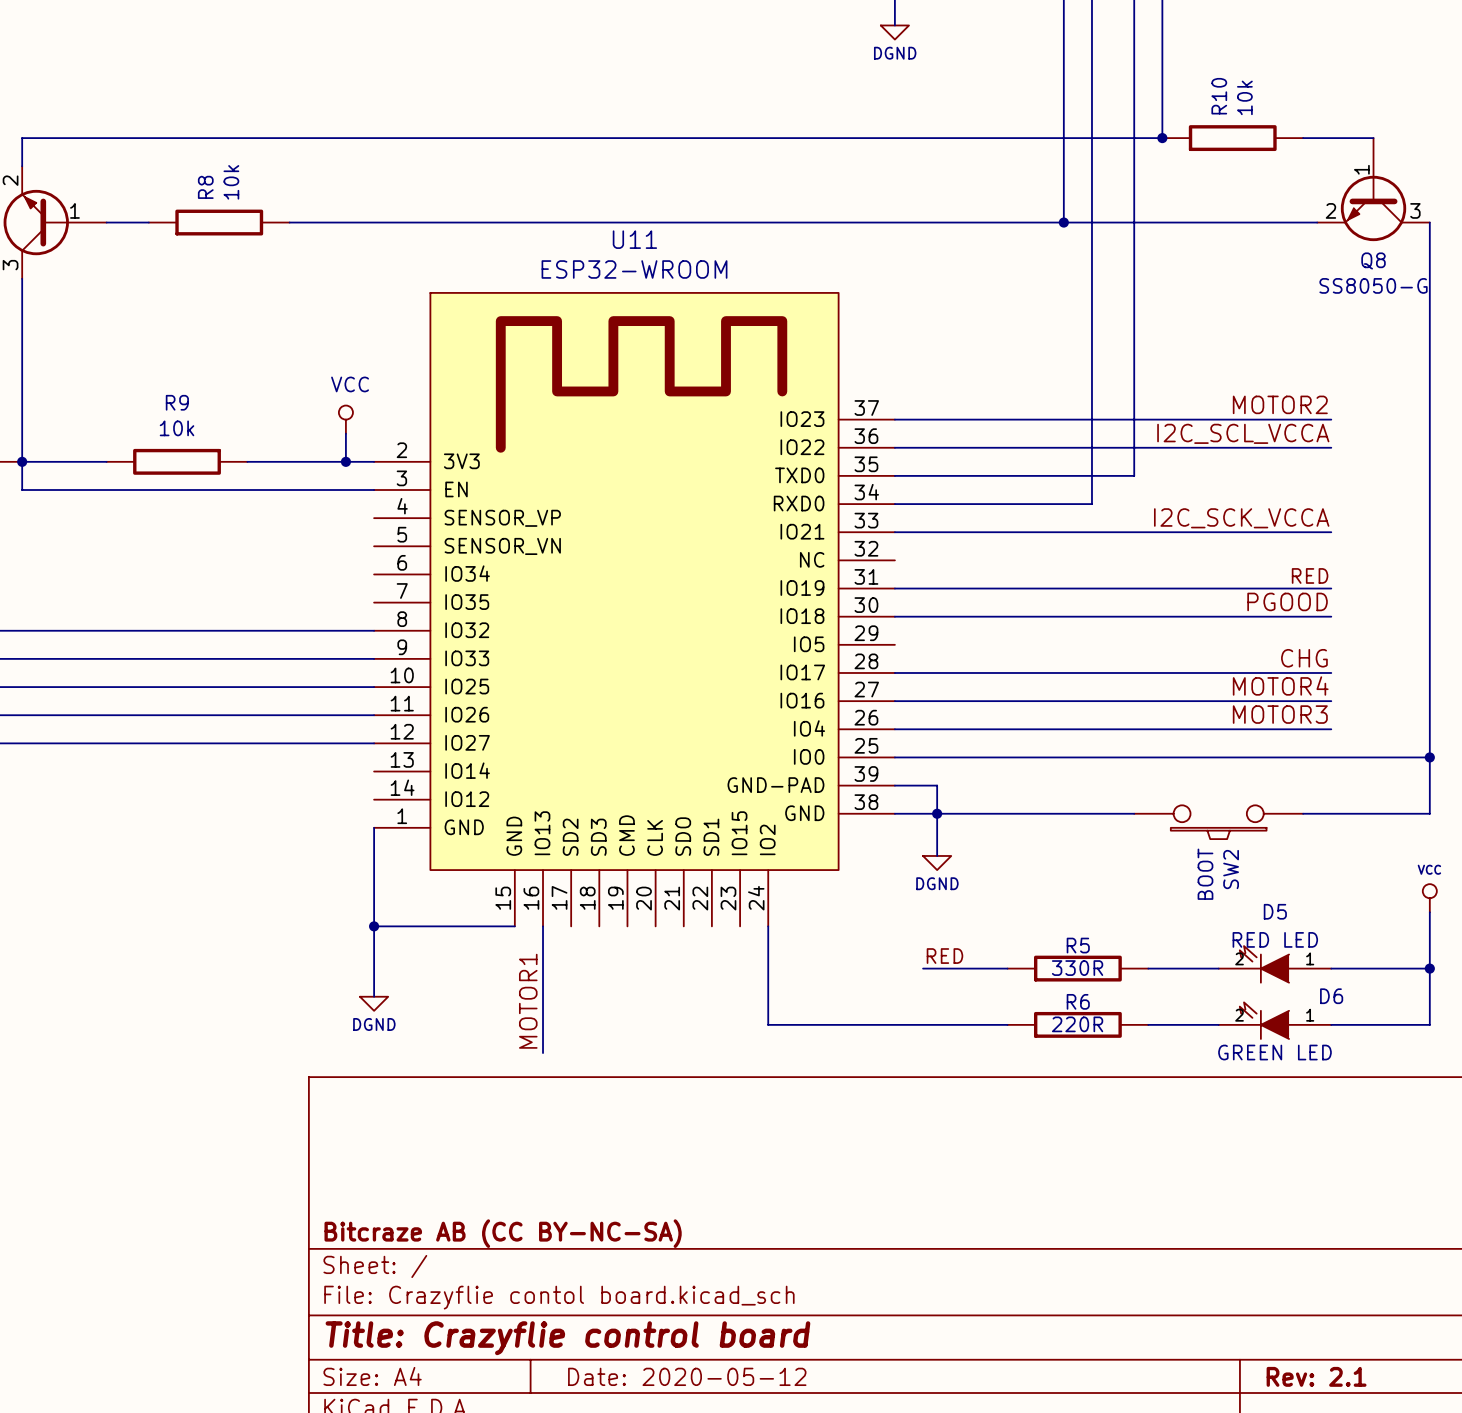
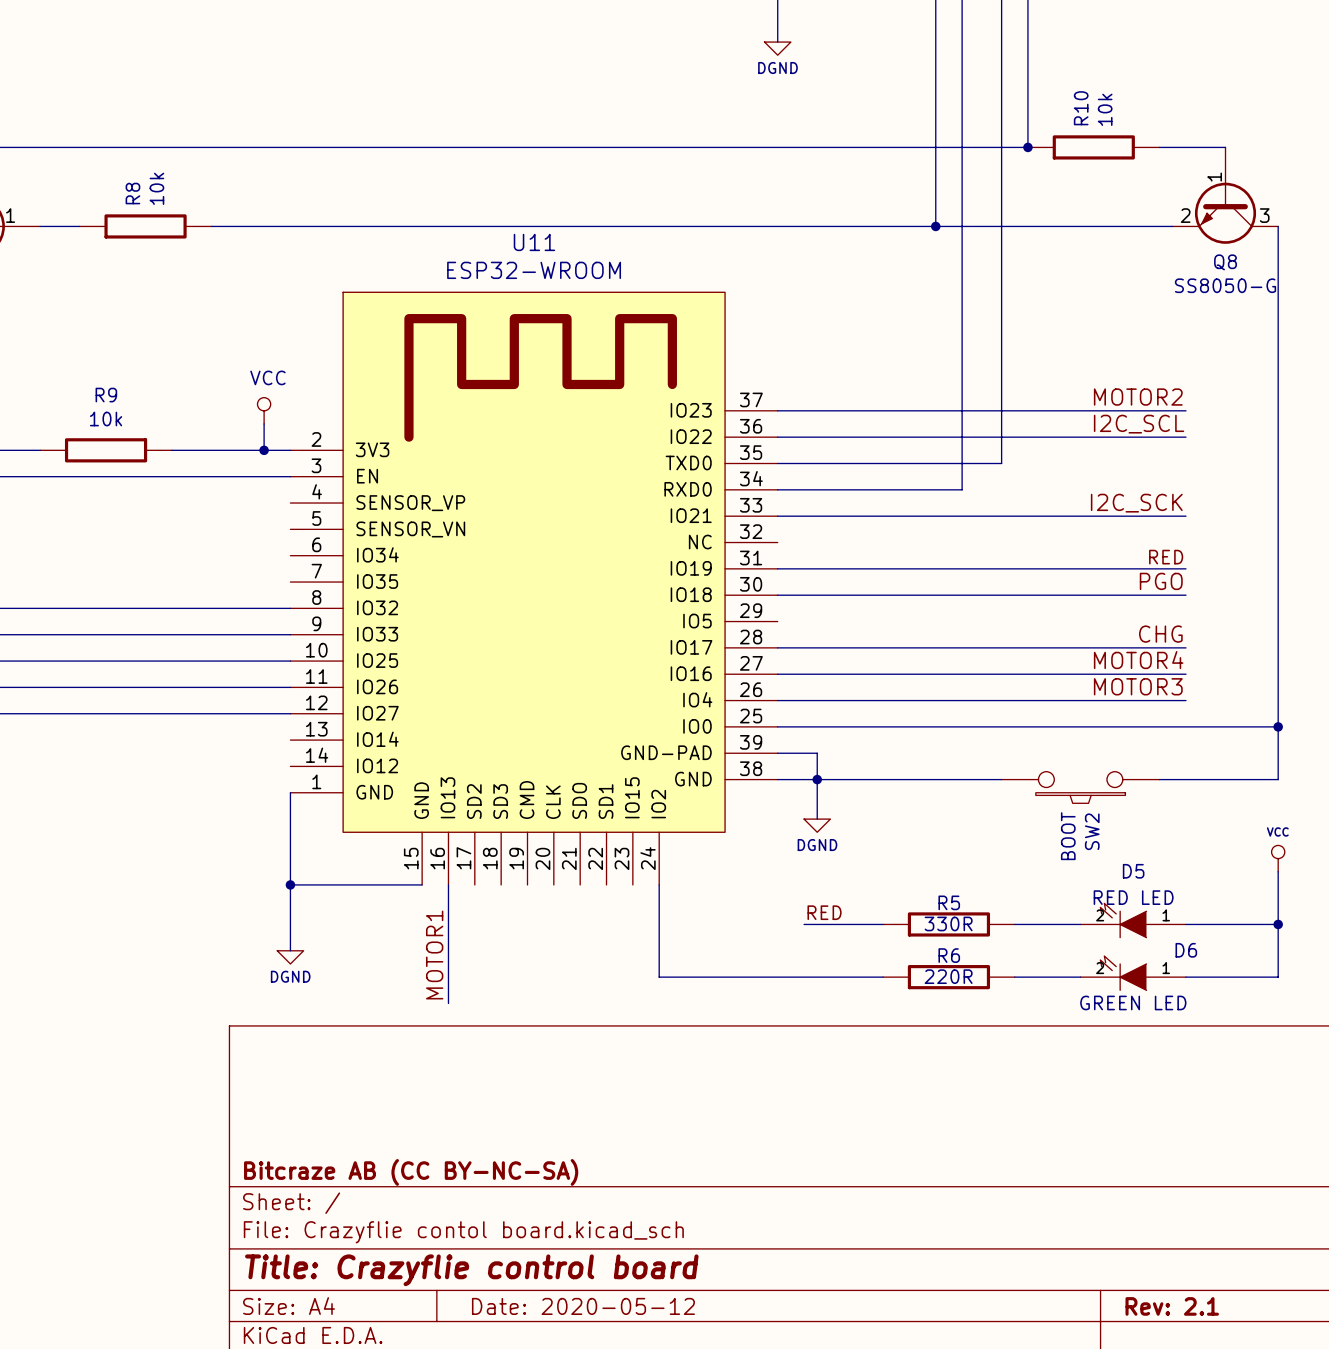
label: I2C_SCL_VCCA (1243, 433) -> I2C_SCL (1139, 424)
label: I2C_SCK_VCCA (1241, 518) -> I2C_SCK (1136, 503)
label: PGOOD (1287, 601) -> PGO (1161, 581)

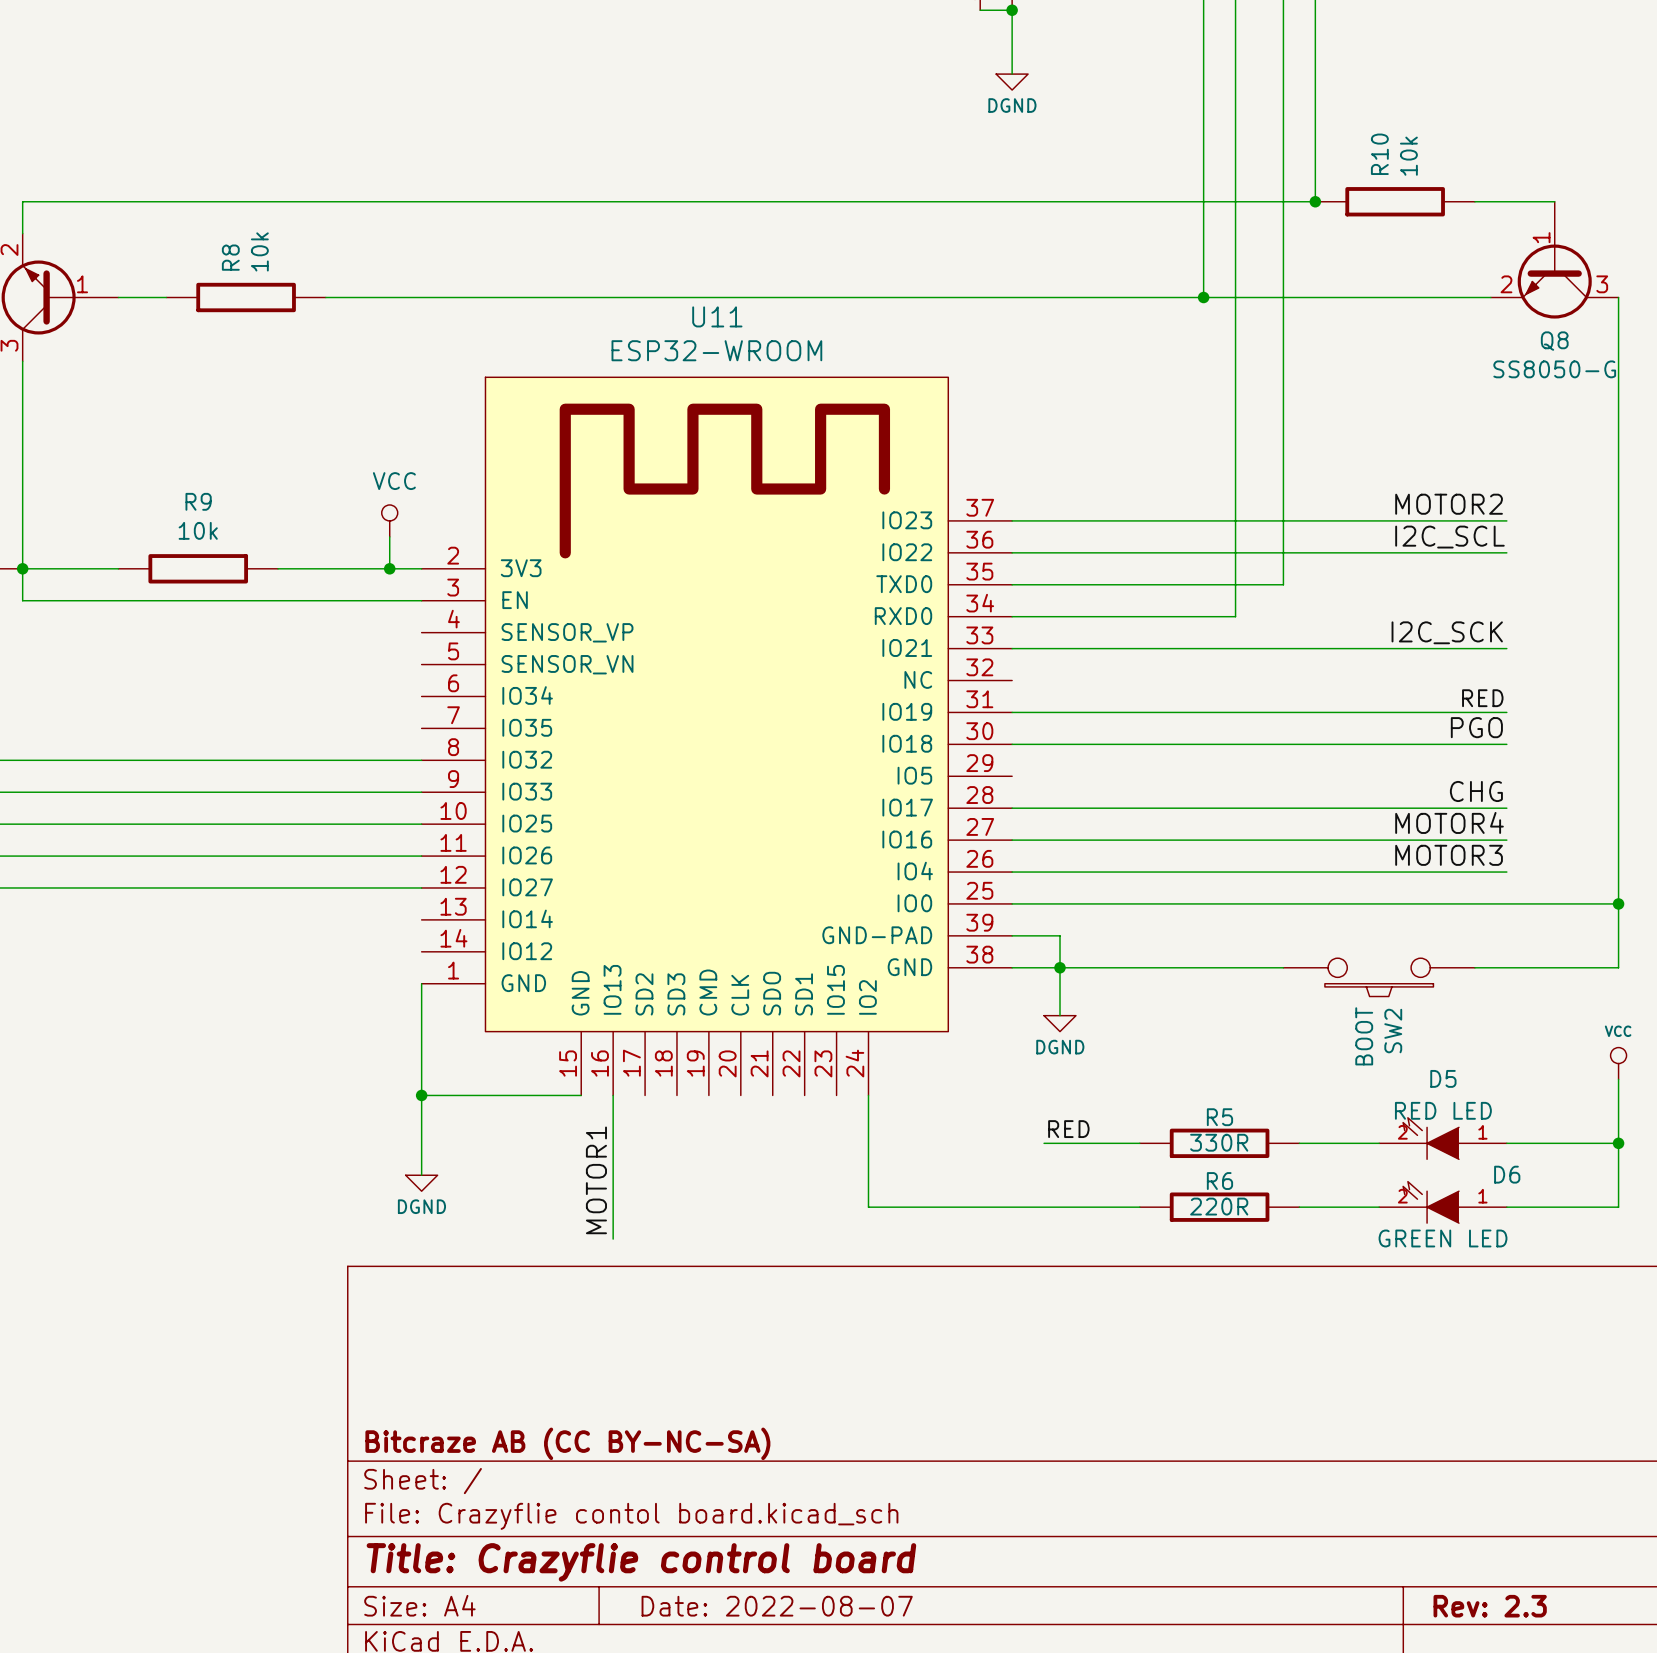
title block: Date: 2020-05-12 (583, 1306) -> Date: 2022-08-07 (777, 1606)
title block: Rev: 2.1 (1172, 1306) -> Rev: 2.3 (1490, 1606)

